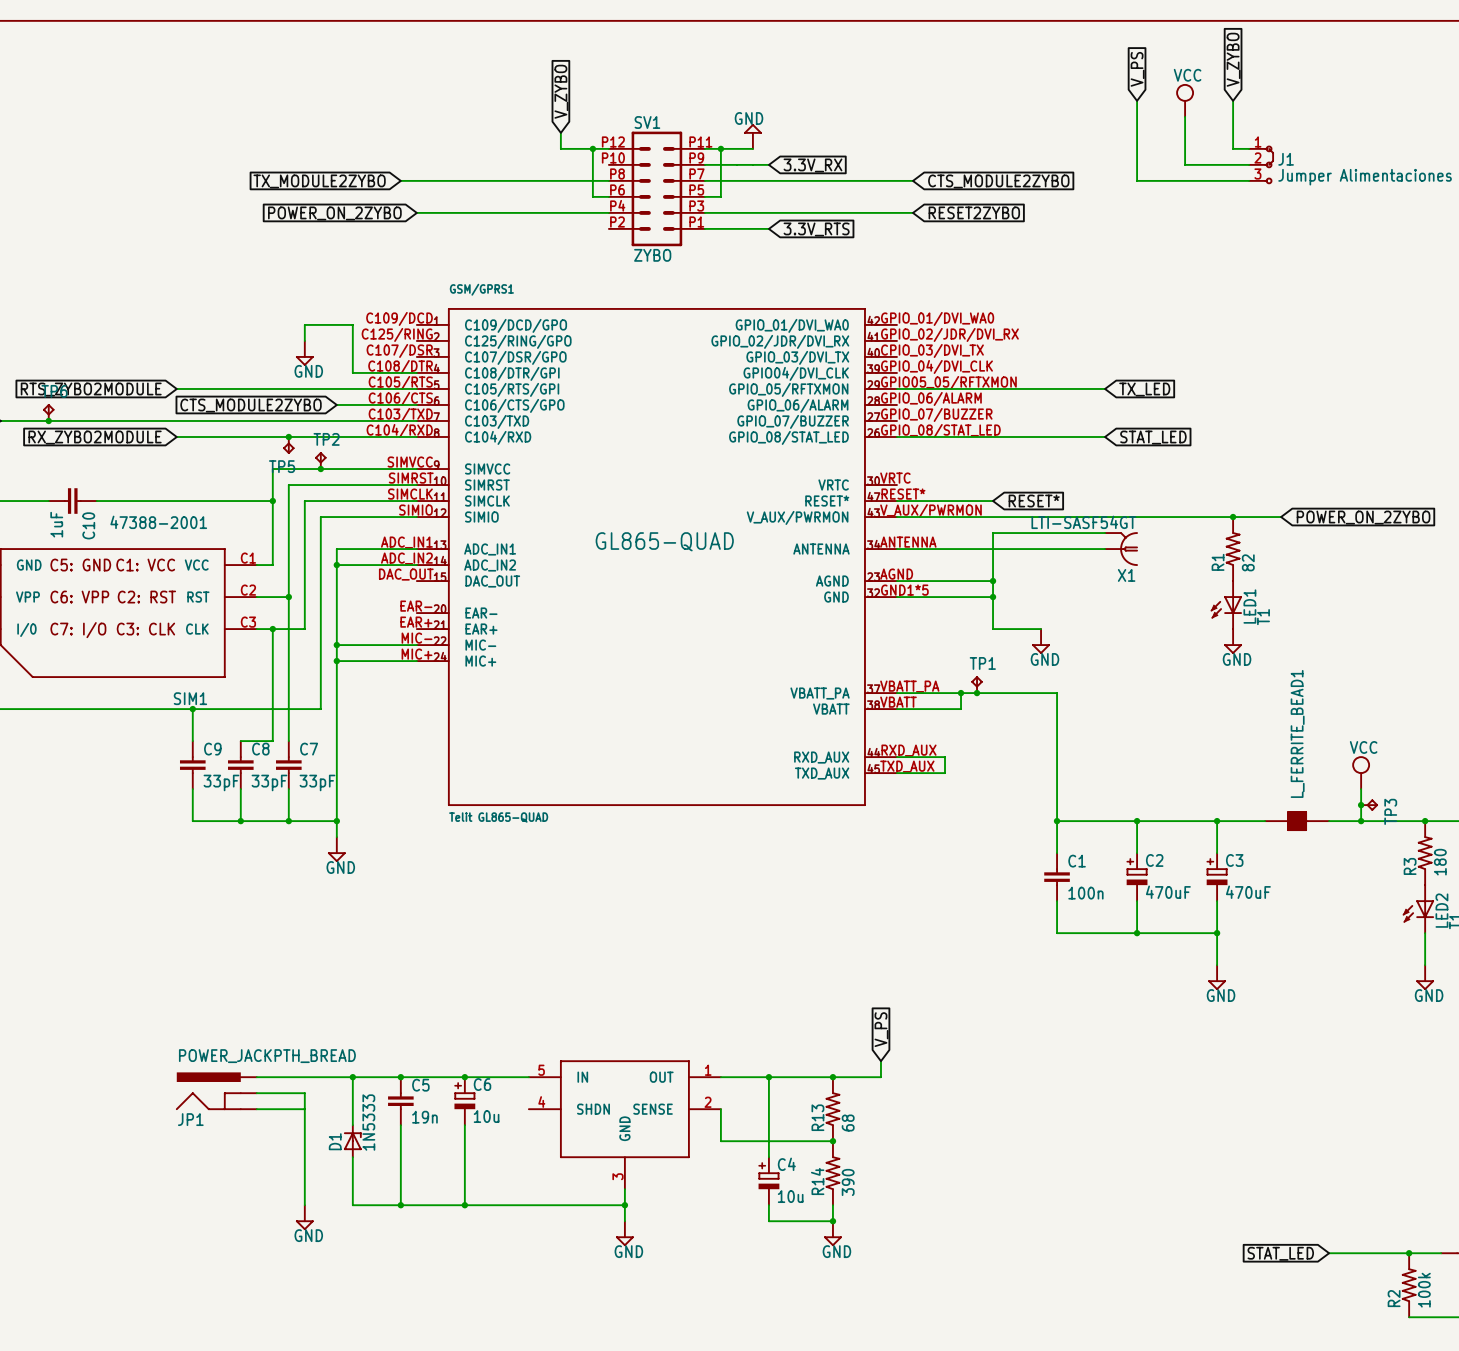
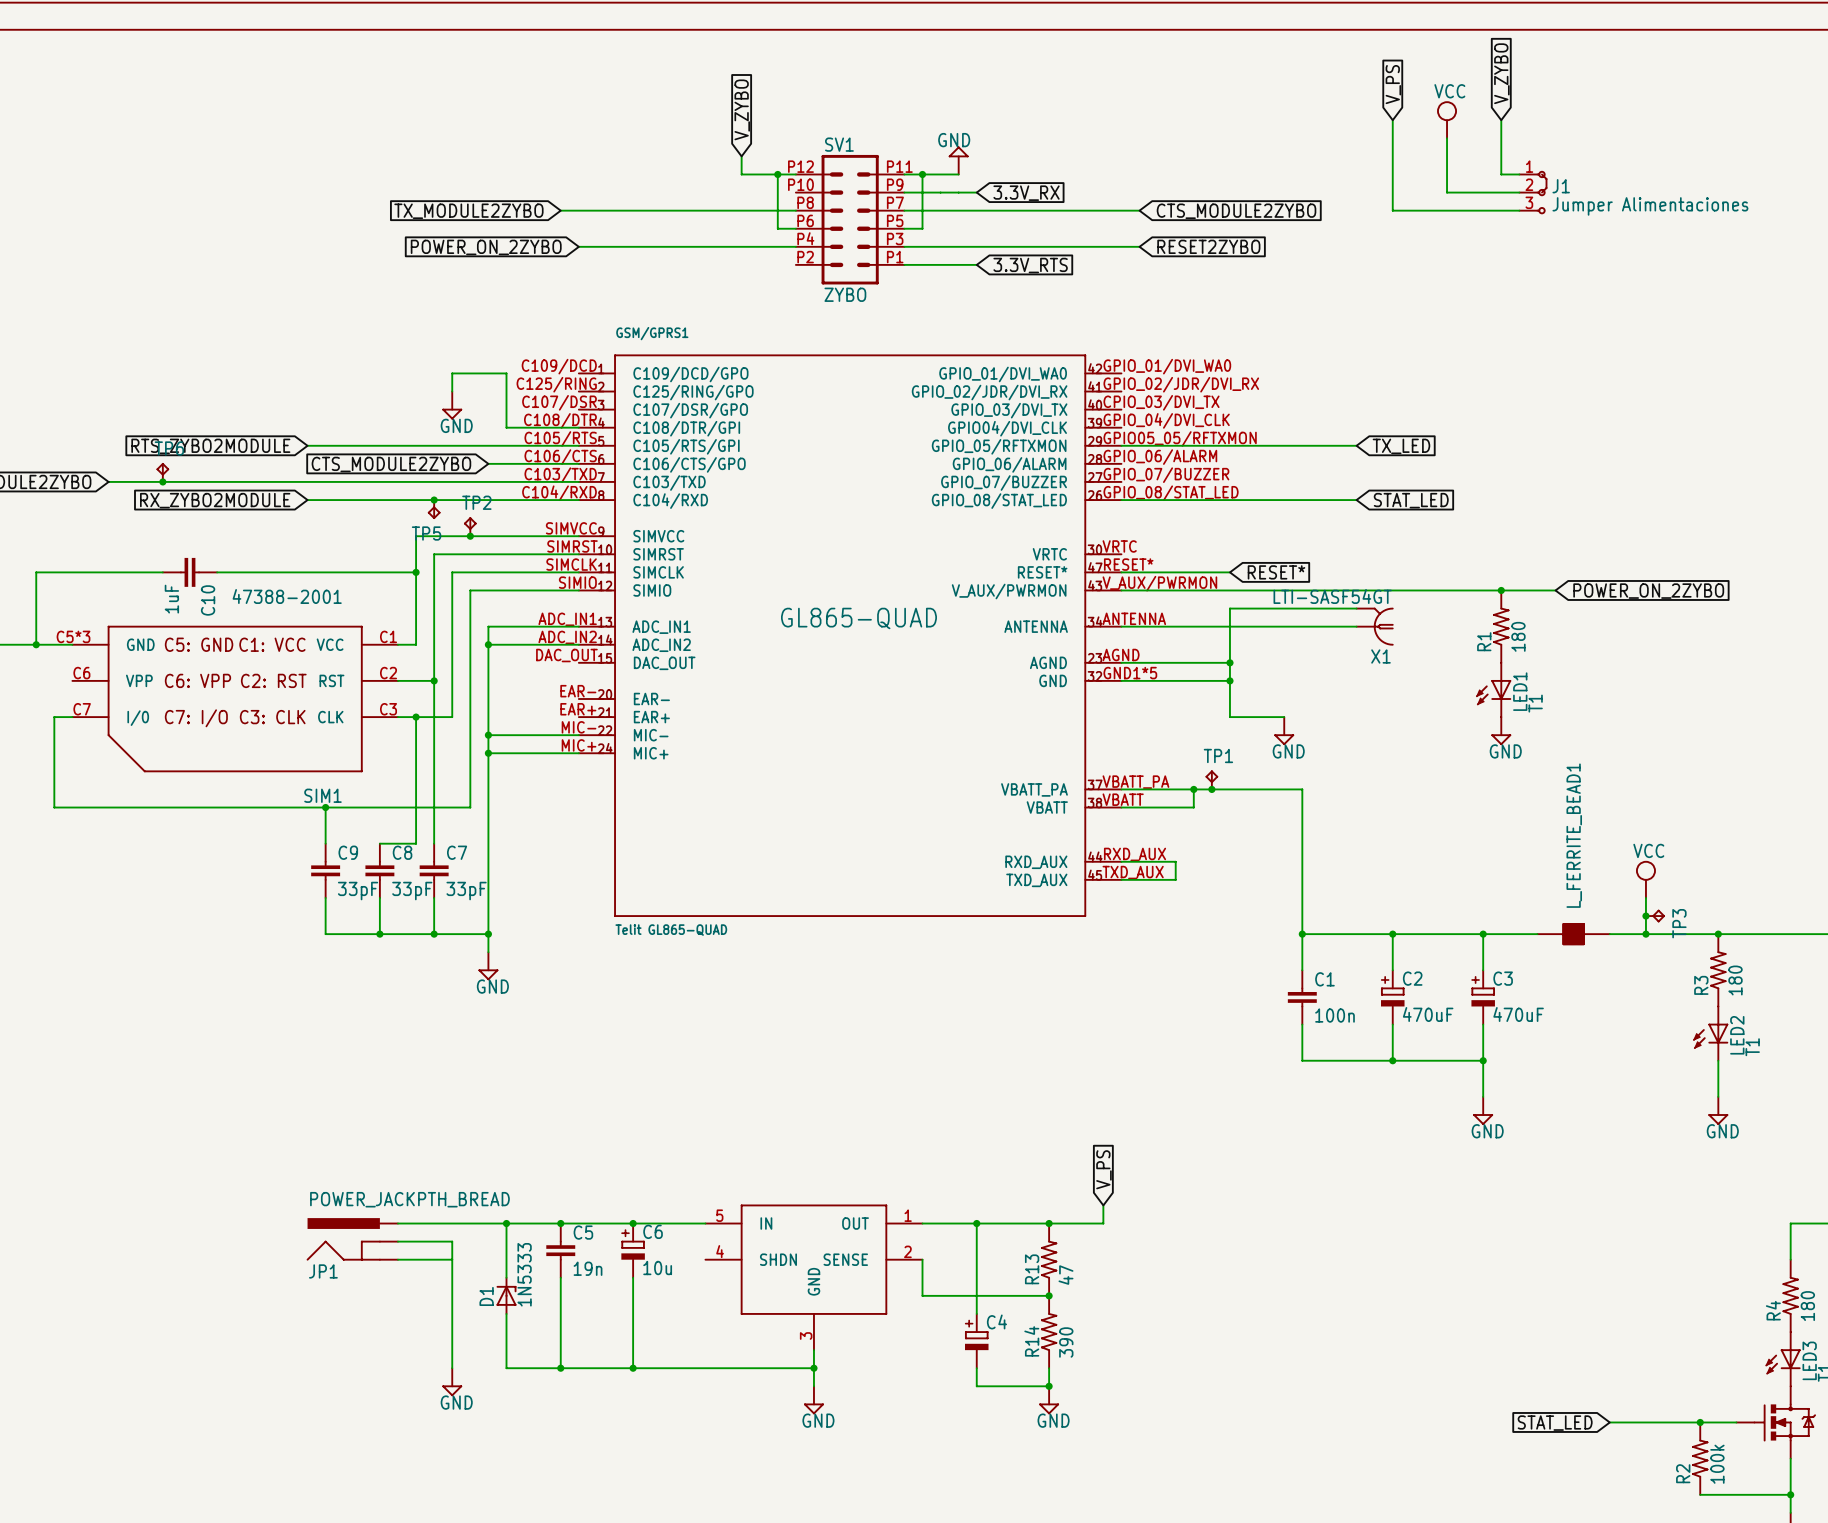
R1 value: 82 (1248, 562) -> 180 (1518, 636)
R13 value: 68 (848, 1123) -> 47 (1065, 1275)
C4 value: 10u (790, 1196) -> none

